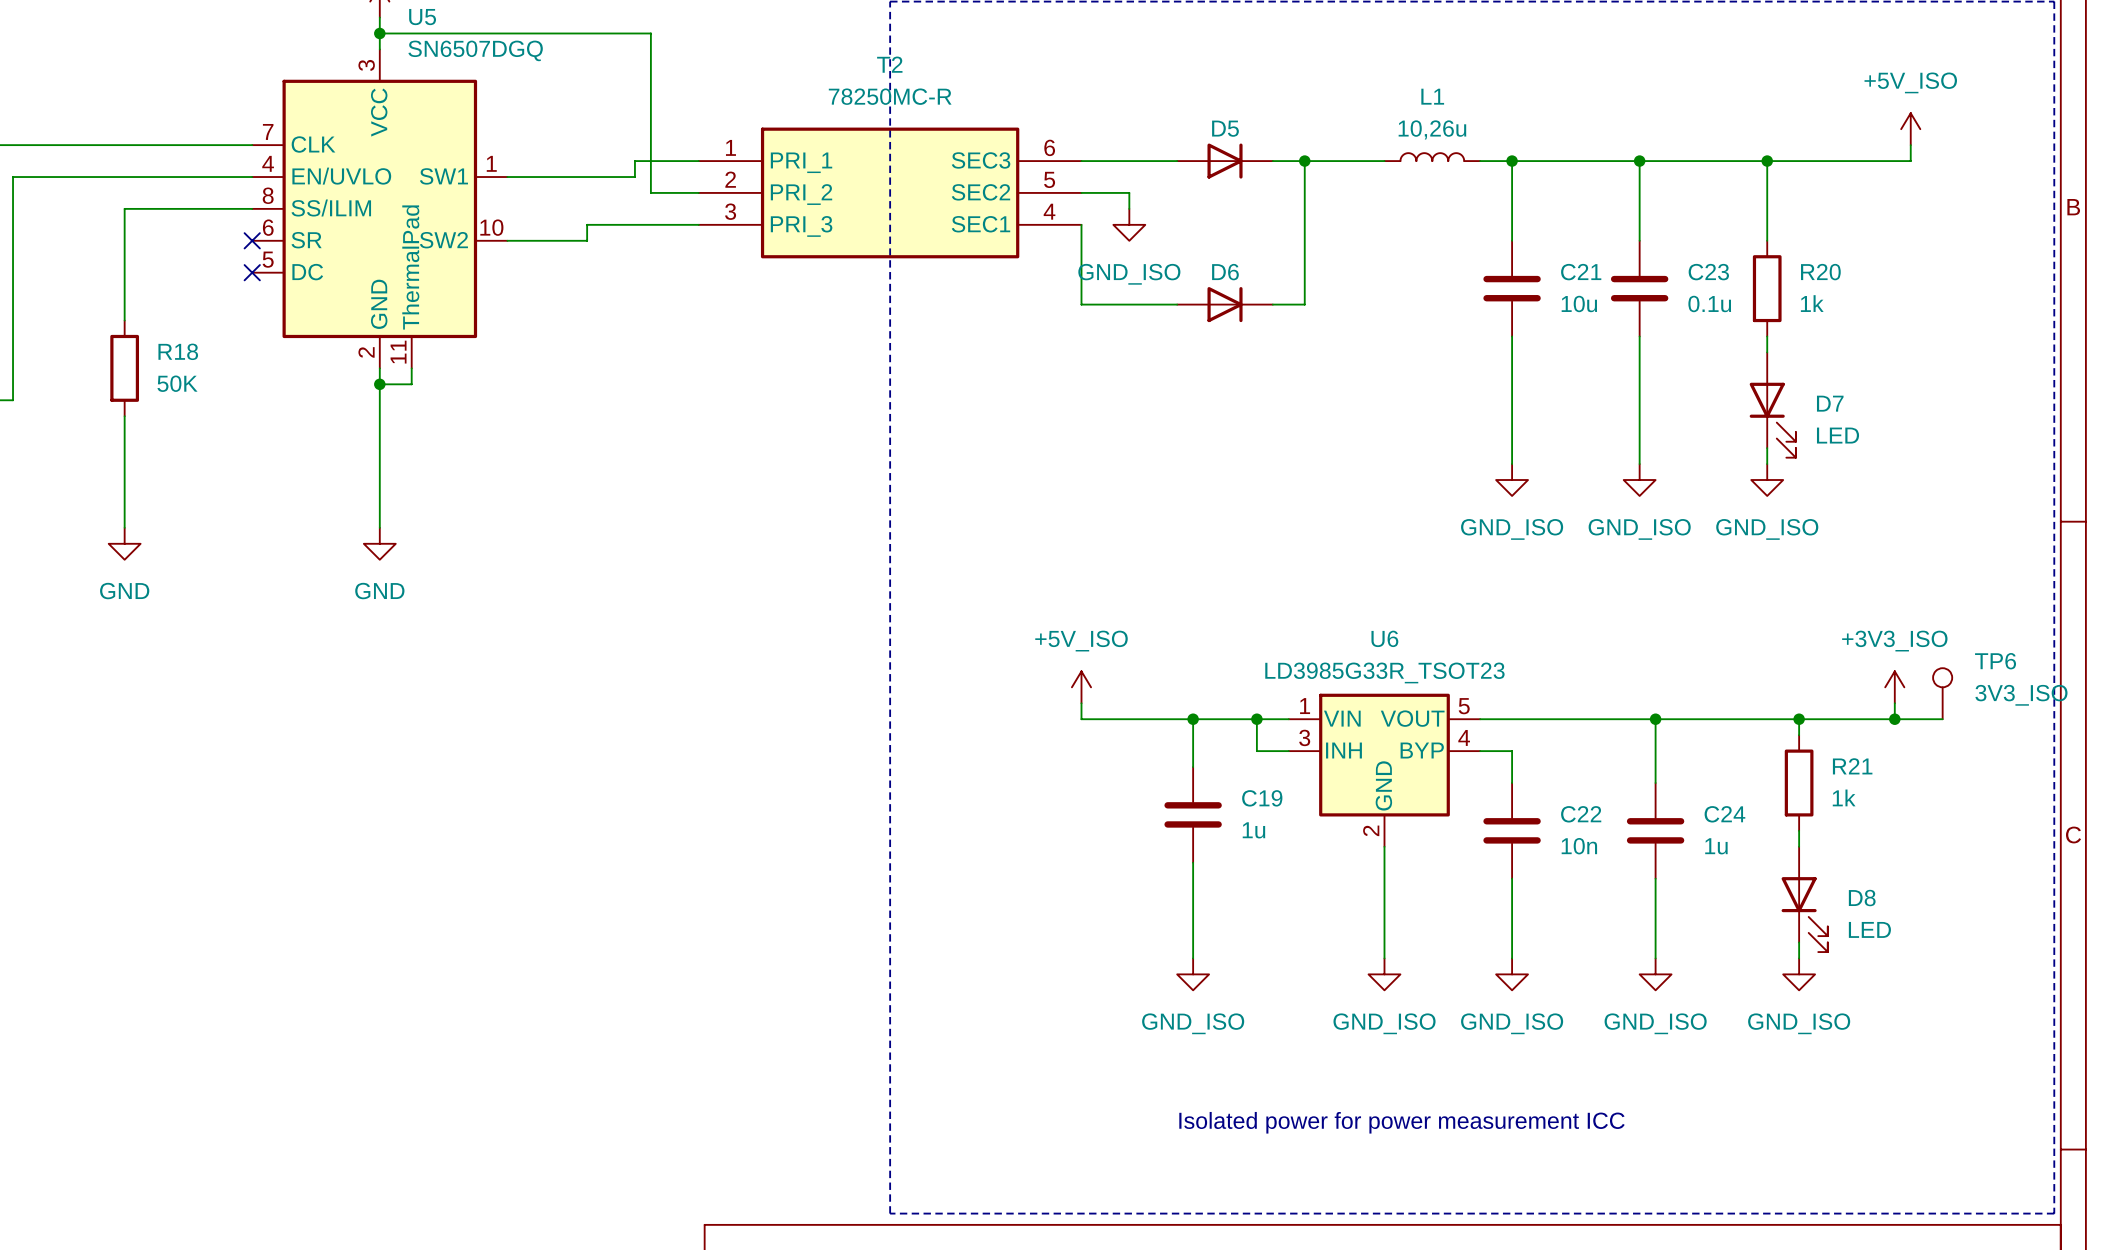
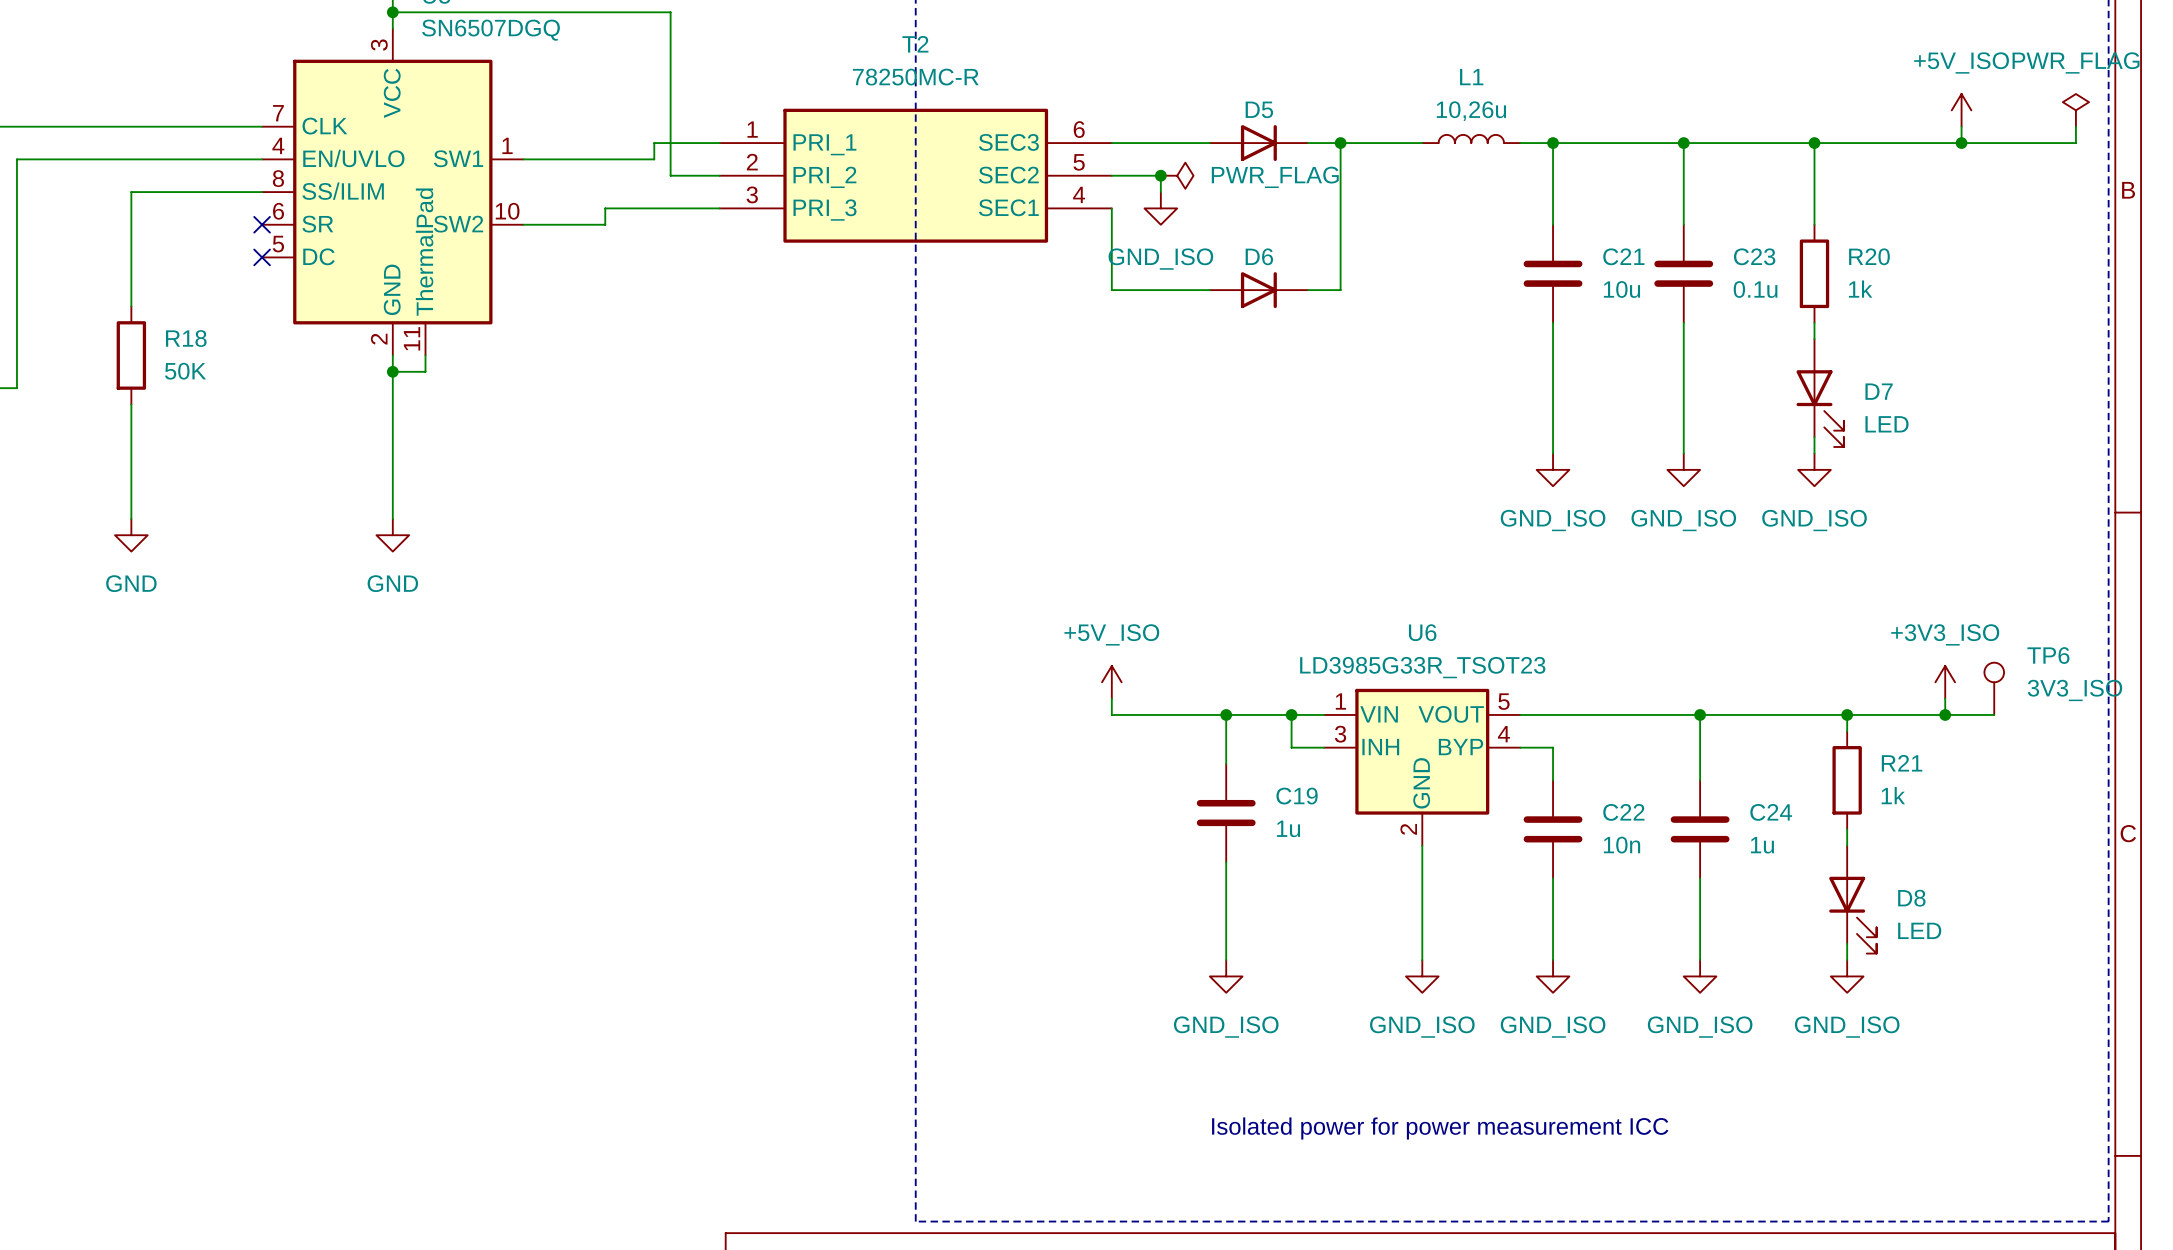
power symbol: none -> PWR_FLAG (2075, 110)
wire: none -> (2075, 126) (2075, 143) (1961, 143)
junction: none -> (1961, 143)
junction: none -> (1160, 175)
power symbol: none -> PWR_FLAG (1177, 175)

